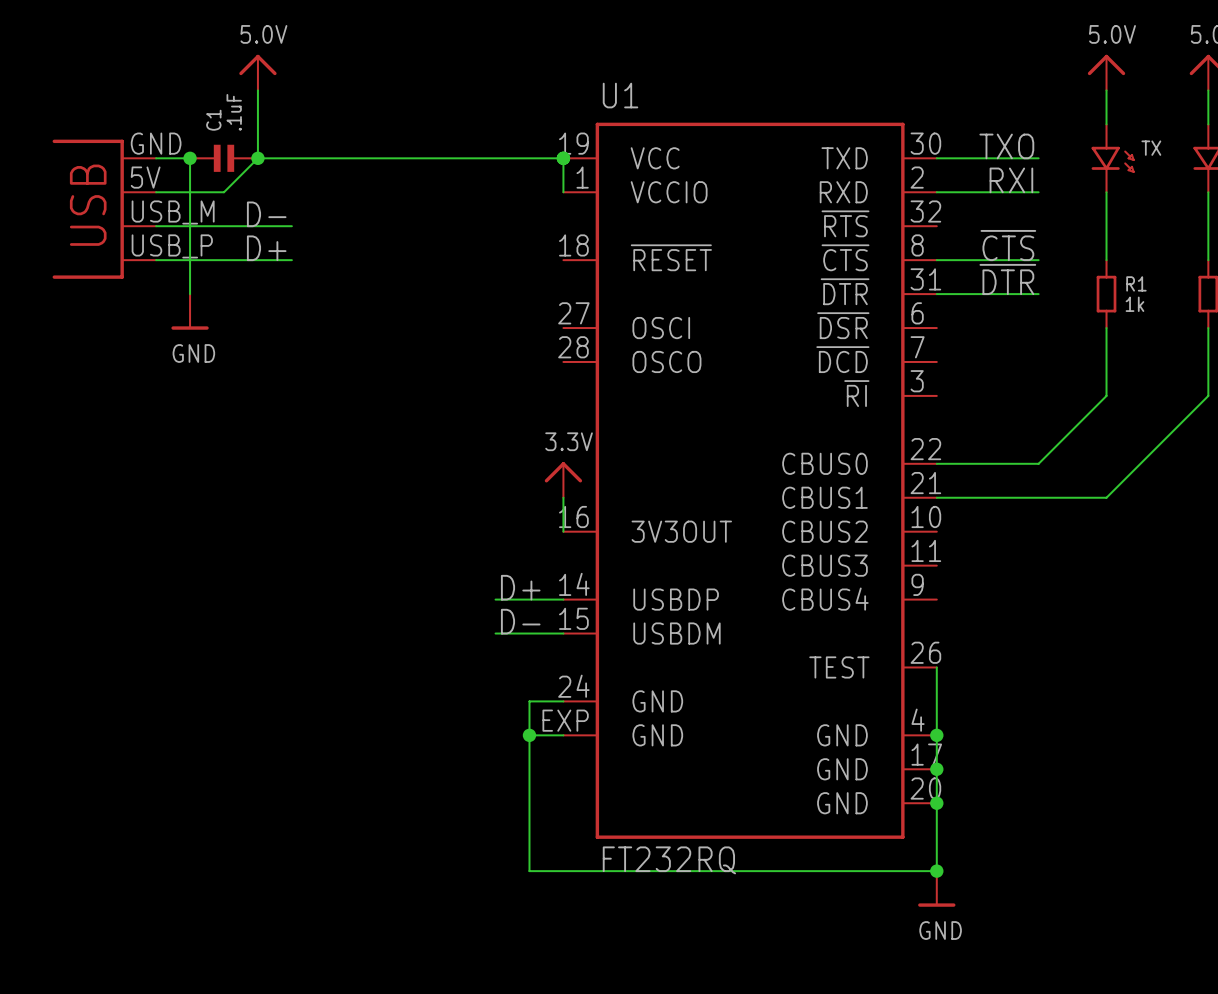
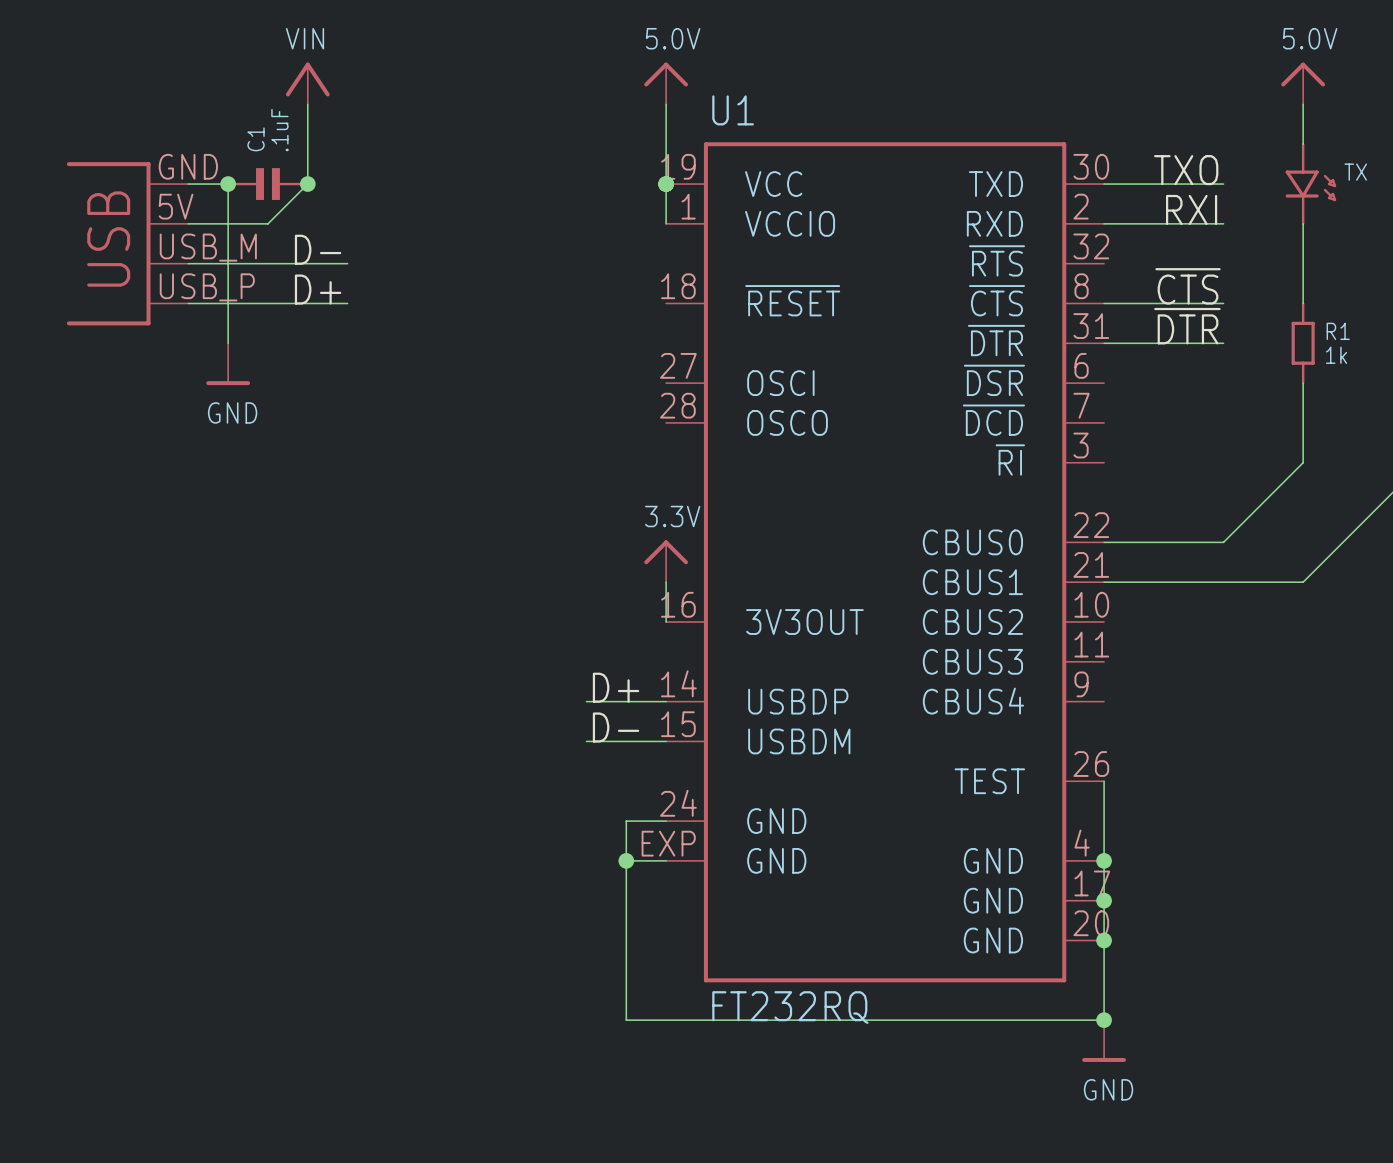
power symbol: 5.0V (257, 72) -> VIN (307, 83)
power symbol: none -> 5.0V (666, 83)
wire: (257, 158) (563, 158) -> (666, 104) (666, 184)

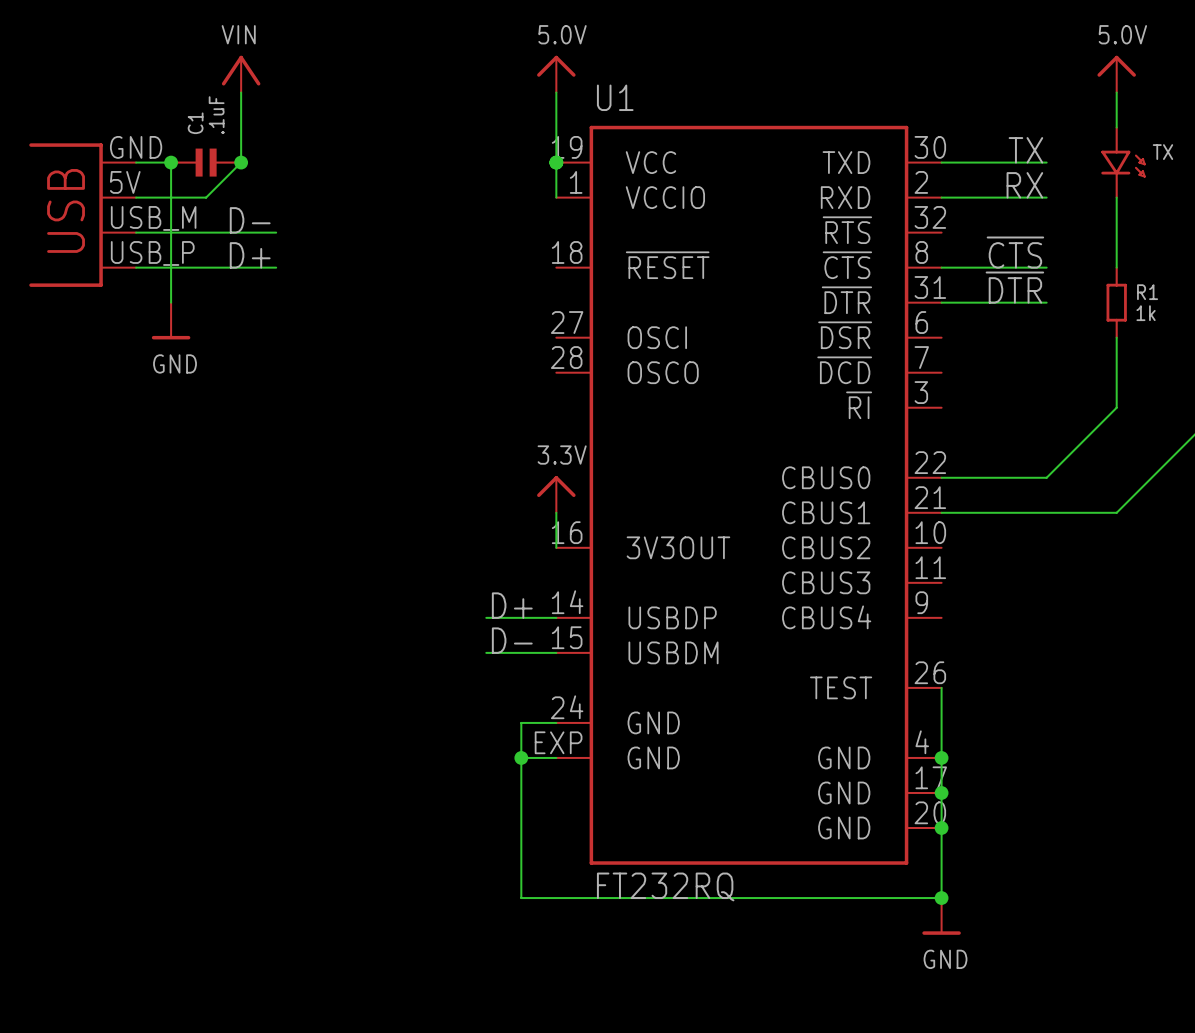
label: TXO (1186, 170) -> TX (1025, 150)
label: RXI (1191, 209) -> RX (1024, 185)

